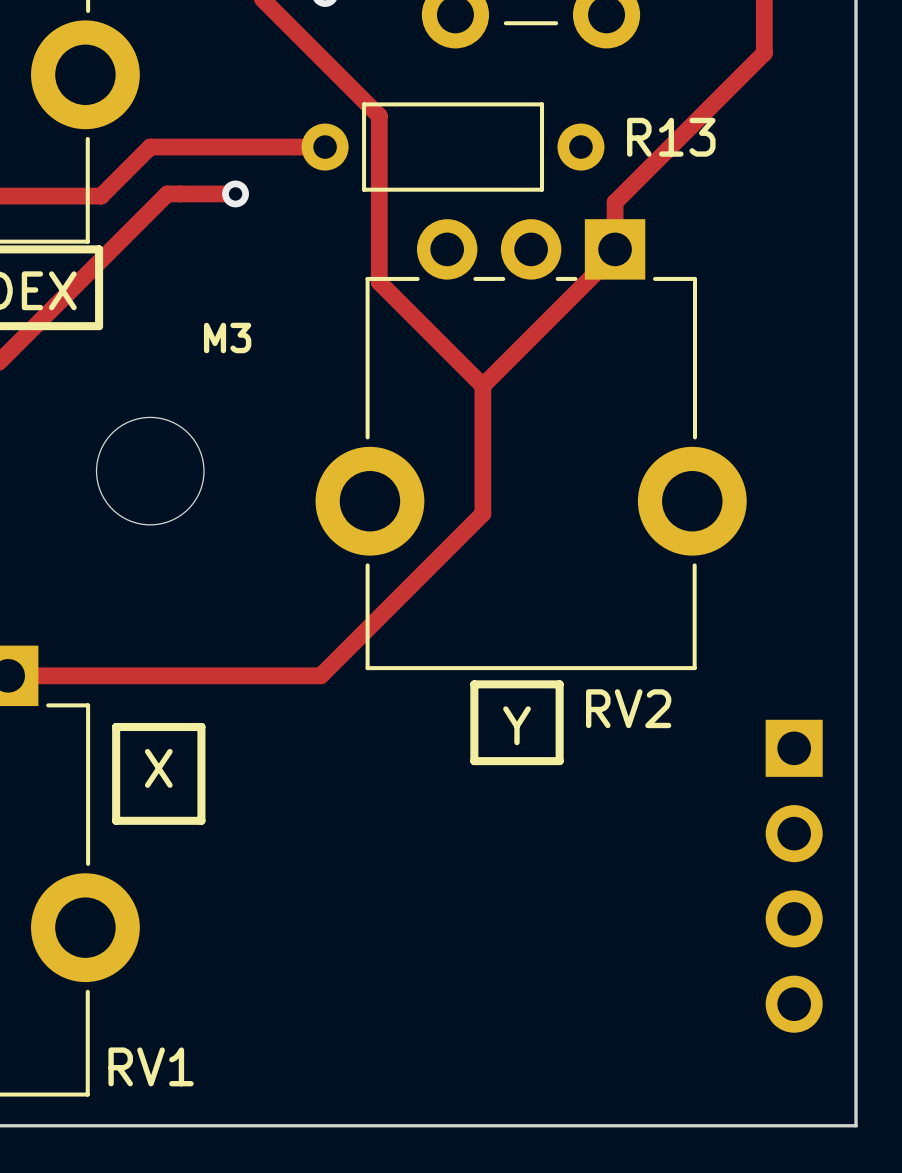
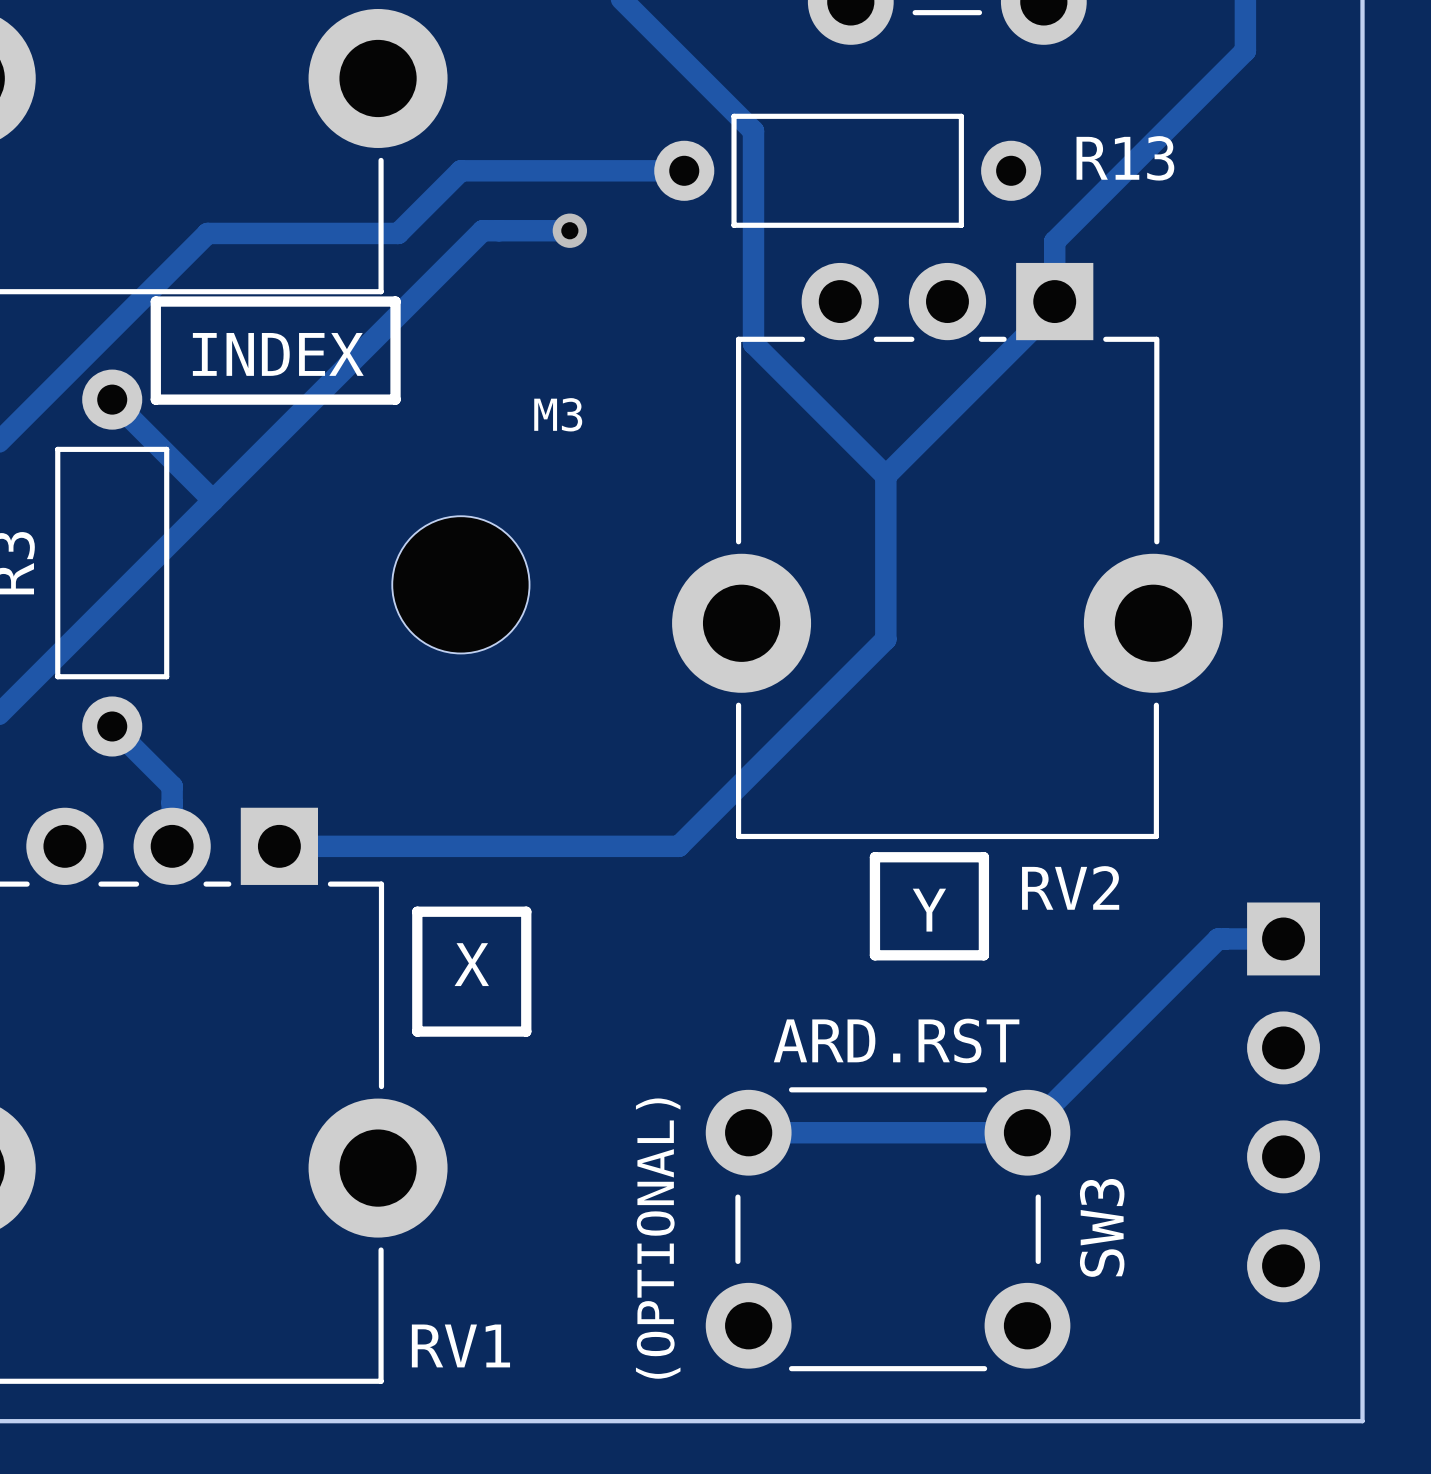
track: none -> (1283, 938) (1218, 938) (1024, 1132) (748, 1132)
text: none -> ARD.RST (896, 1040)
SW3: none -> (888, 1229)
text: none -> (OPTIONAL) (658, 1238)

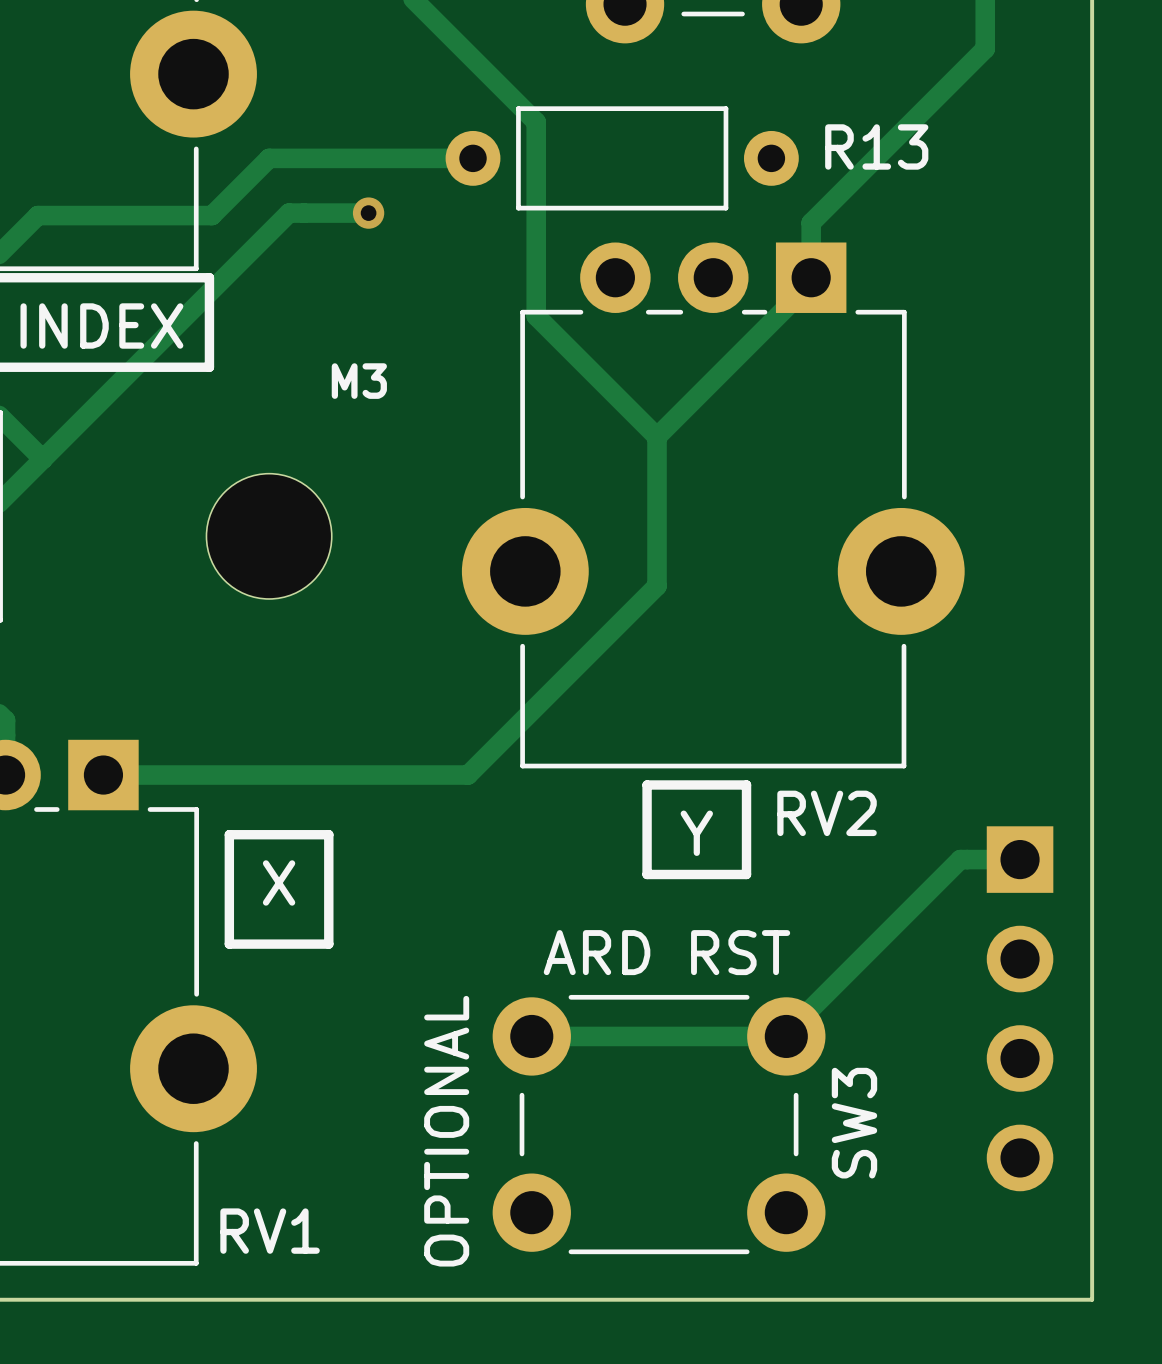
text: ARD.RST (896, 1040) -> ARD RST (666, 952)
text: (OPTIONAL) (658, 1238) -> OPTIONAL (446, 1131)

